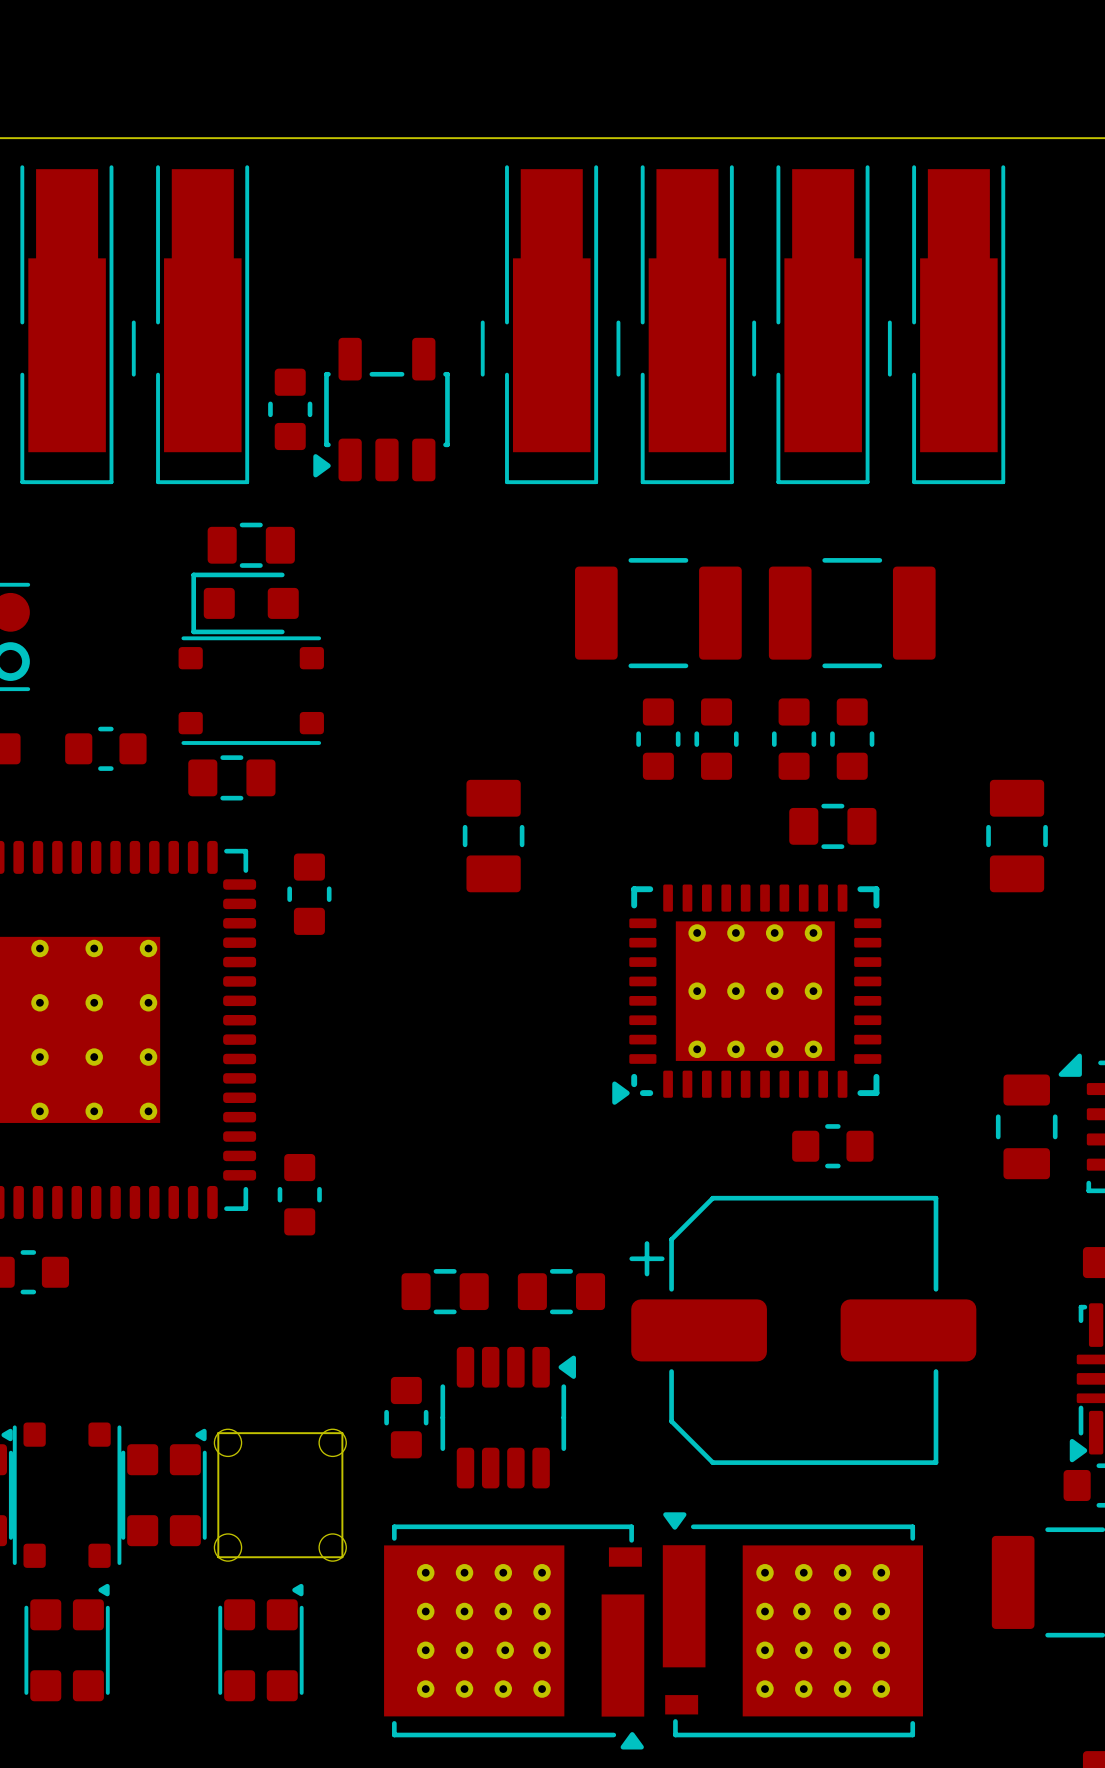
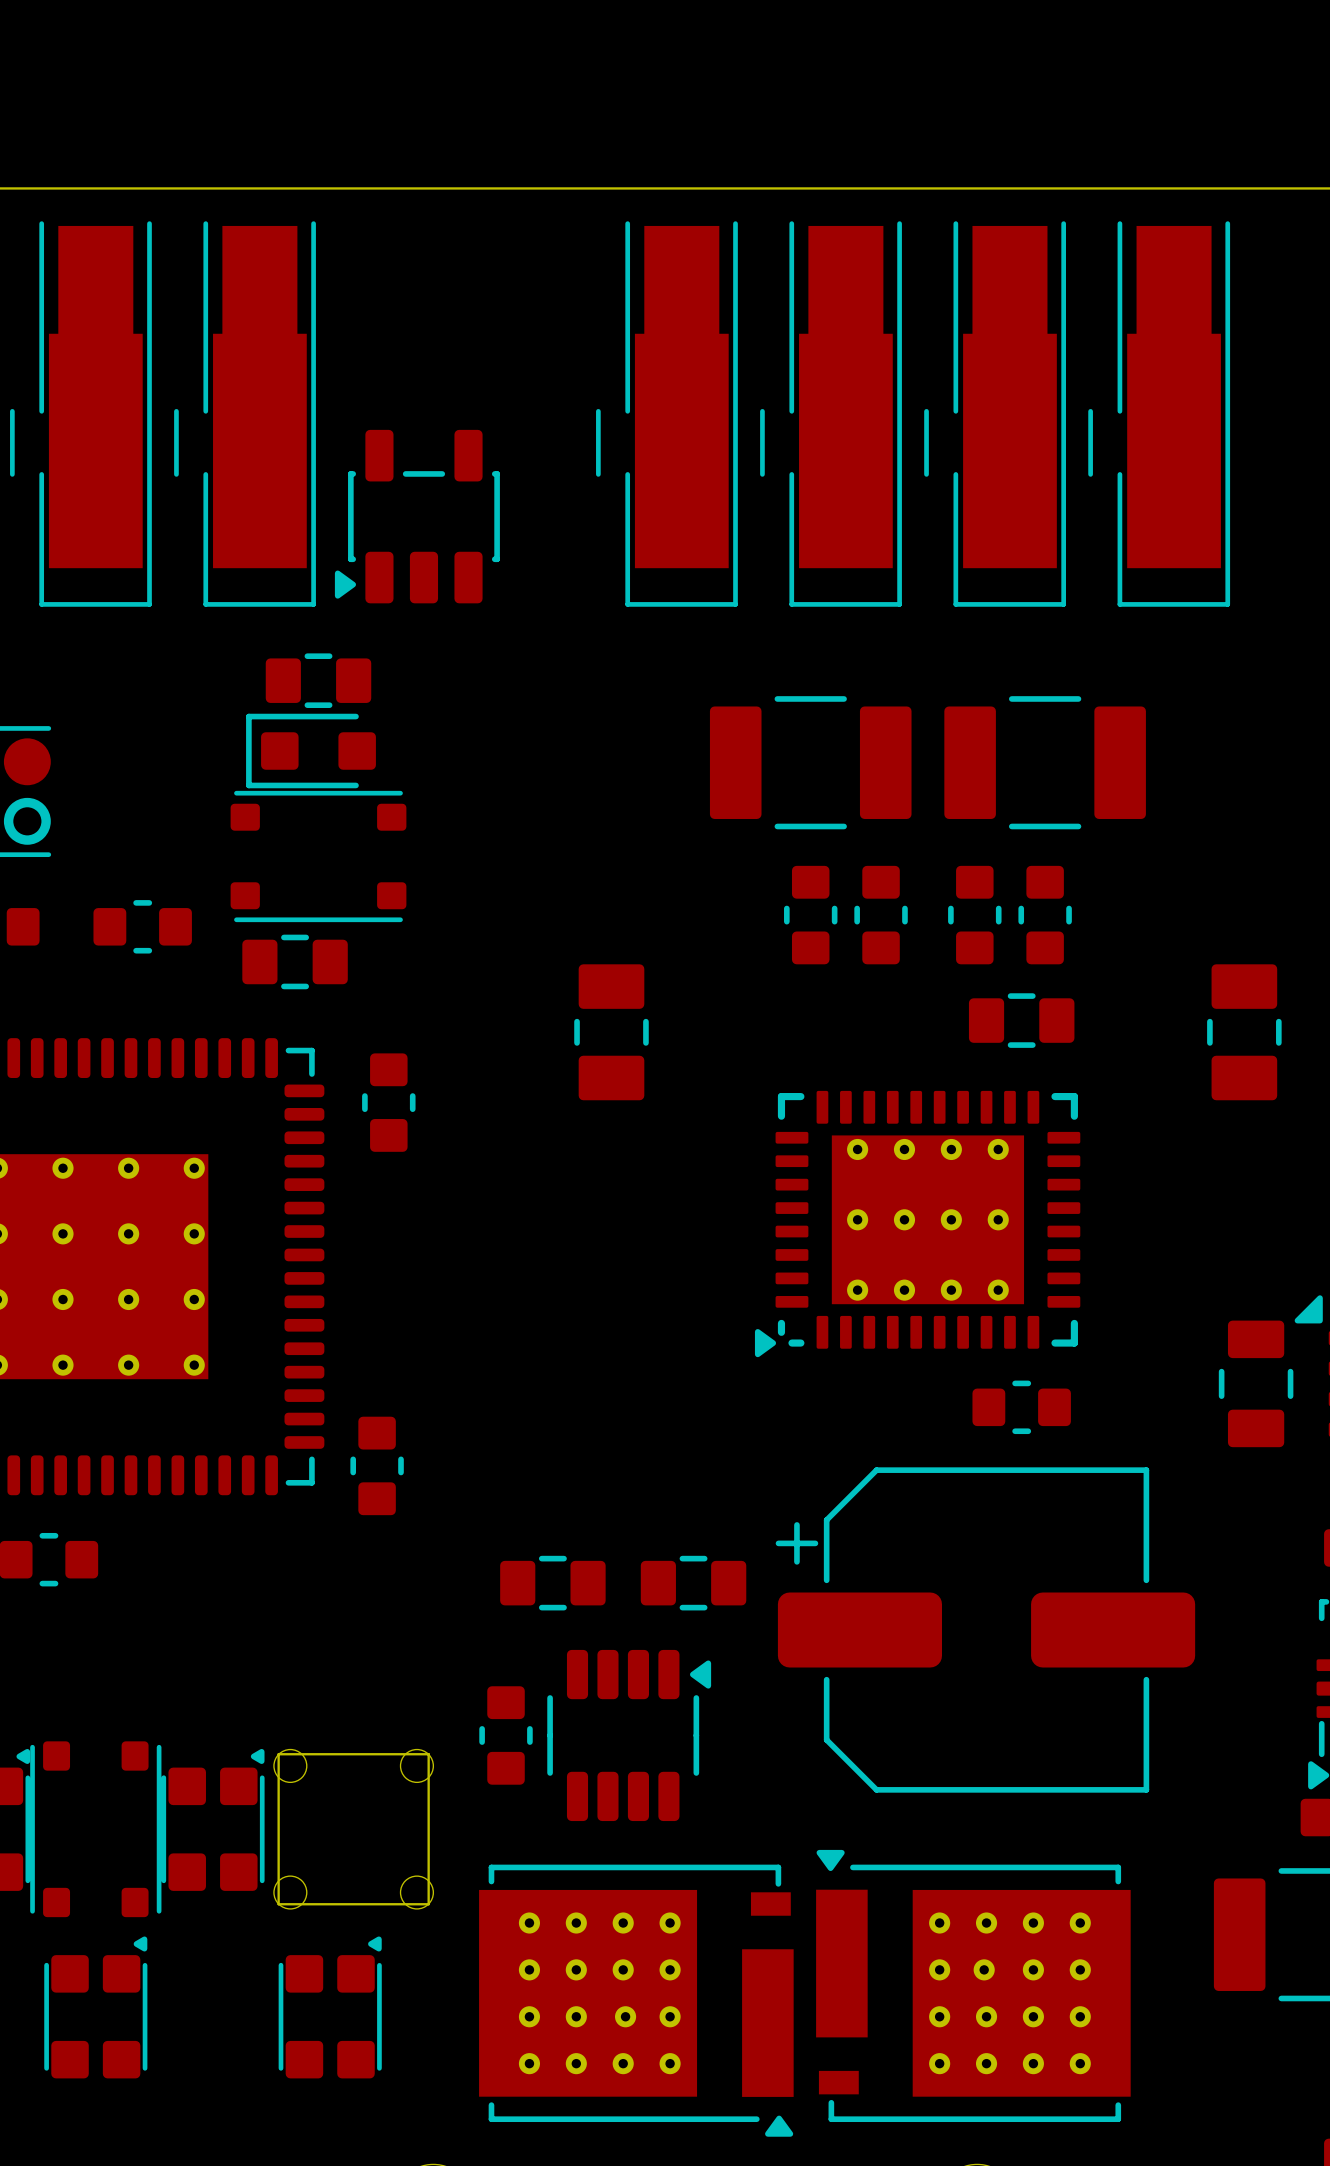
part: (290, 409) -> none
part position: (381, 409) -> (417, 516)

